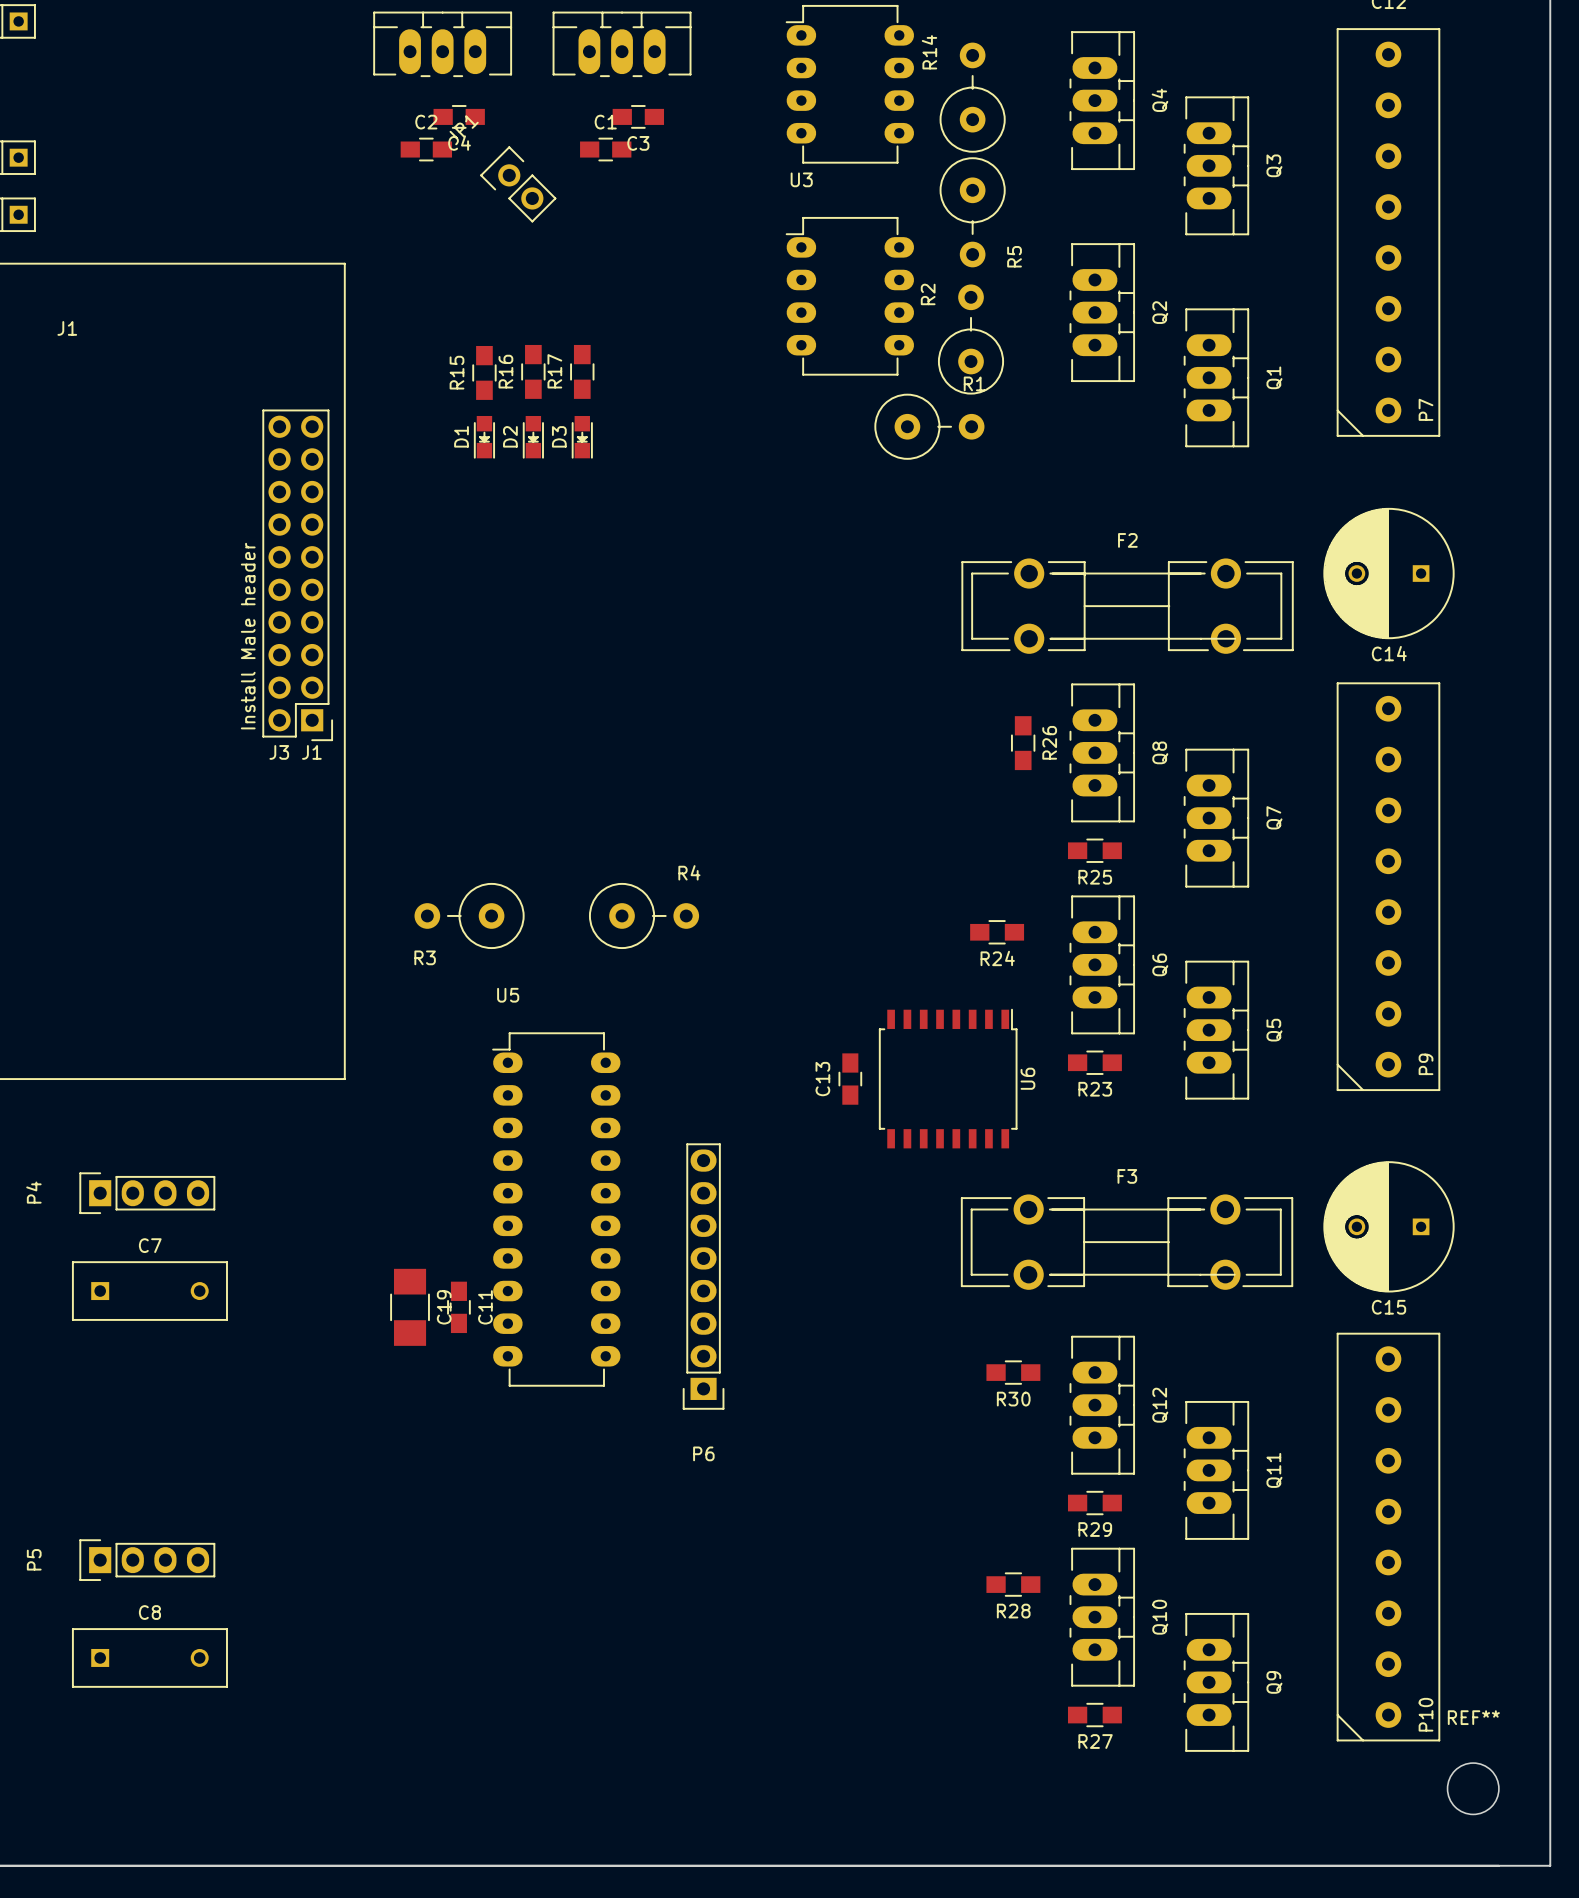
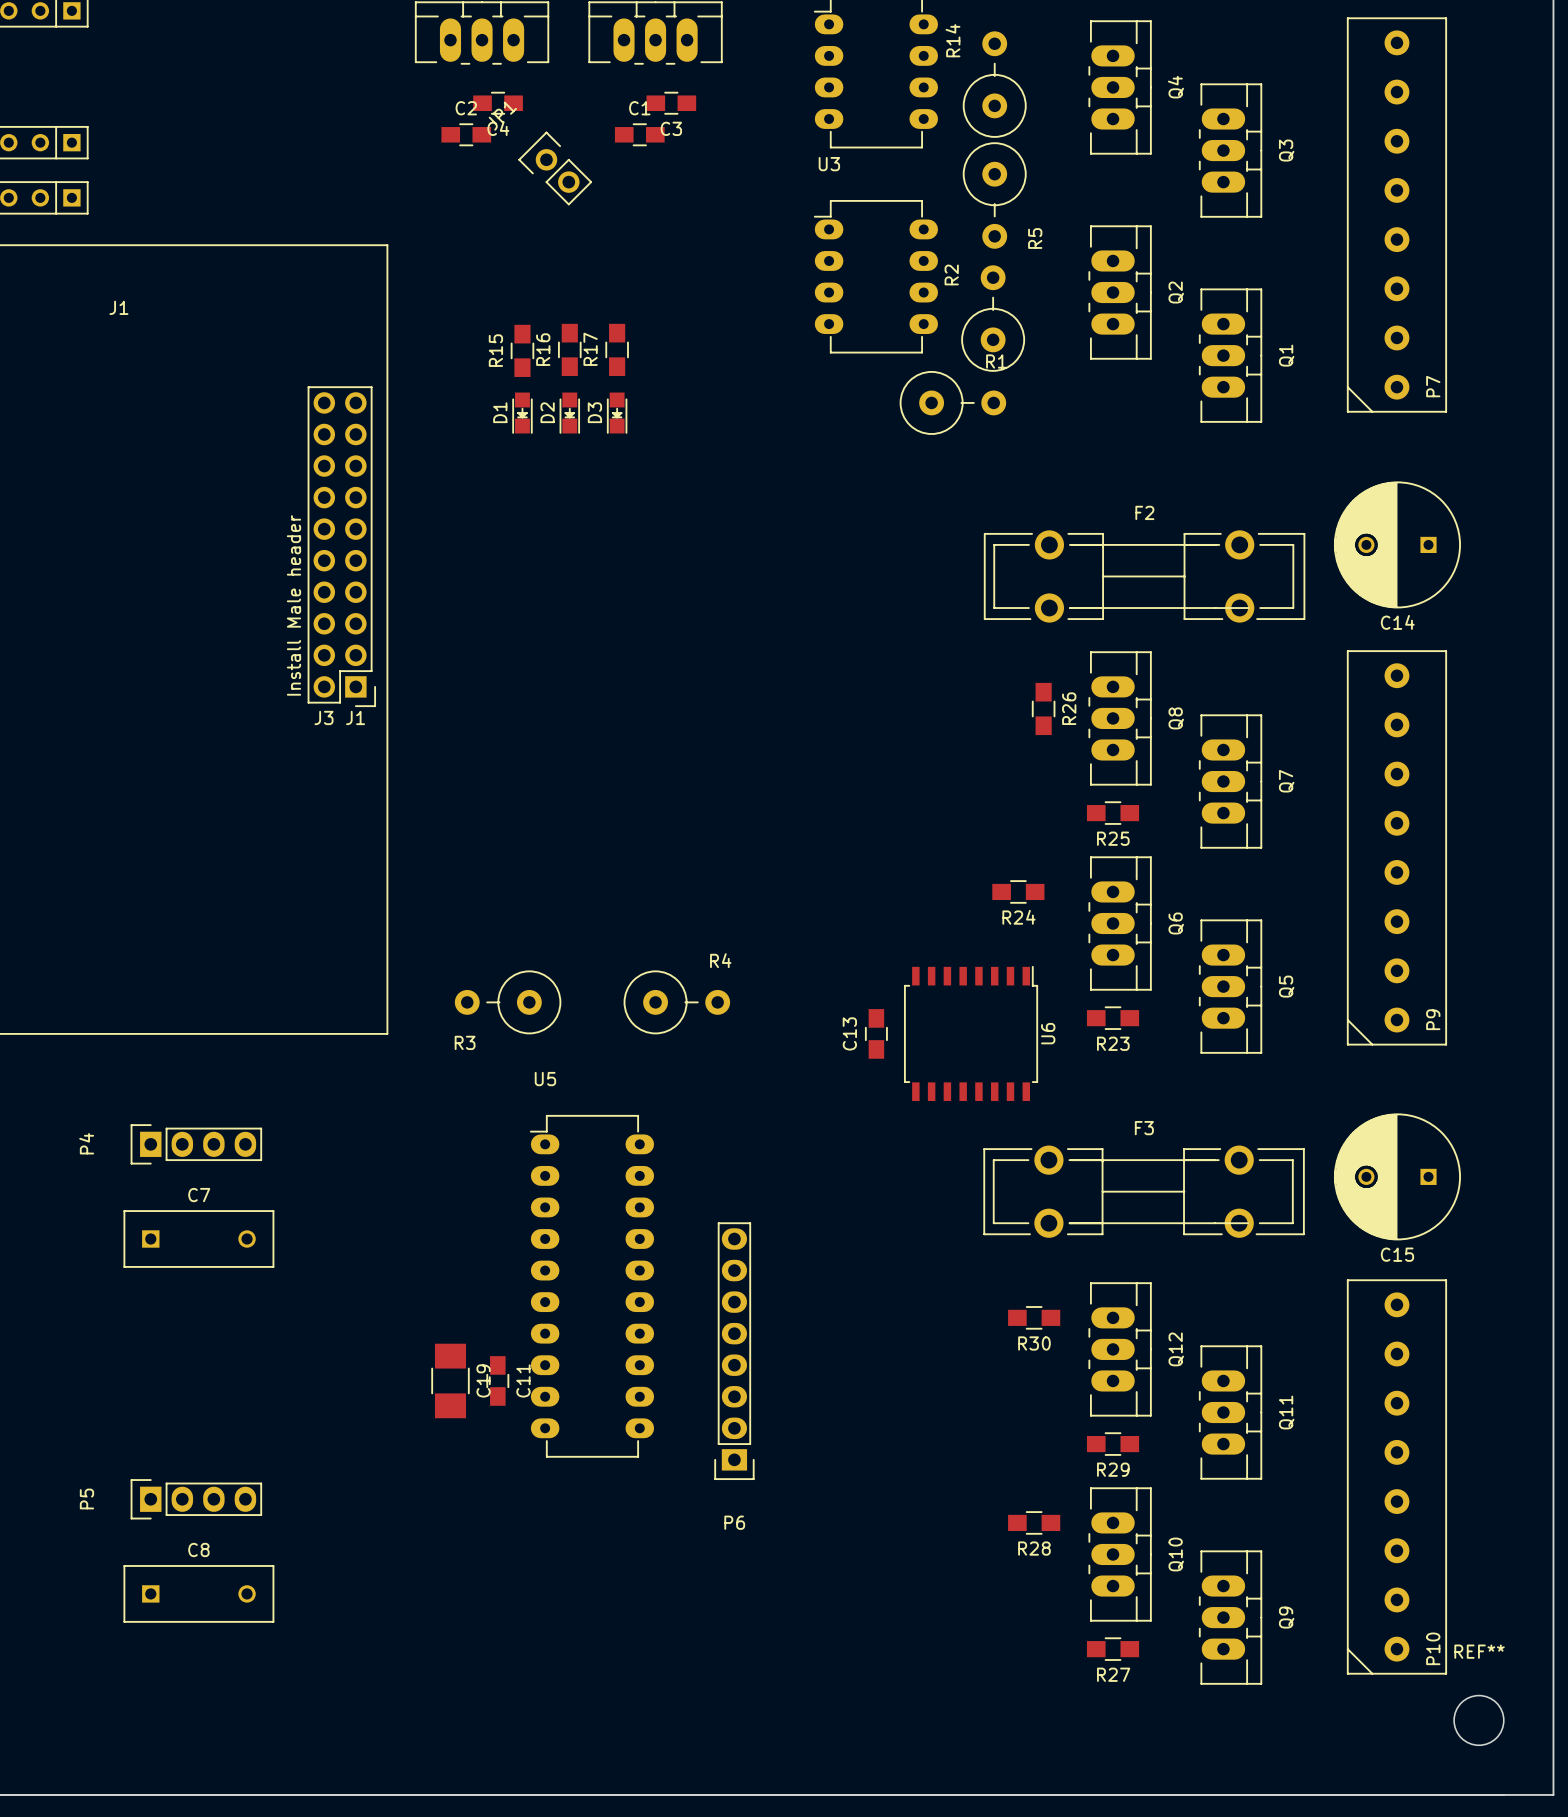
R3 position: (469, 915) -> (508, 1002)
R4 position: (644, 915) -> (676, 1002)
U5 position: (556, 1209) -> (592, 1286)
P6 position: (703, 1276) -> (734, 1351)
C19 position: (410, 1307) -> (450, 1380)
C11 position: (458, 1307) -> (497, 1380)

